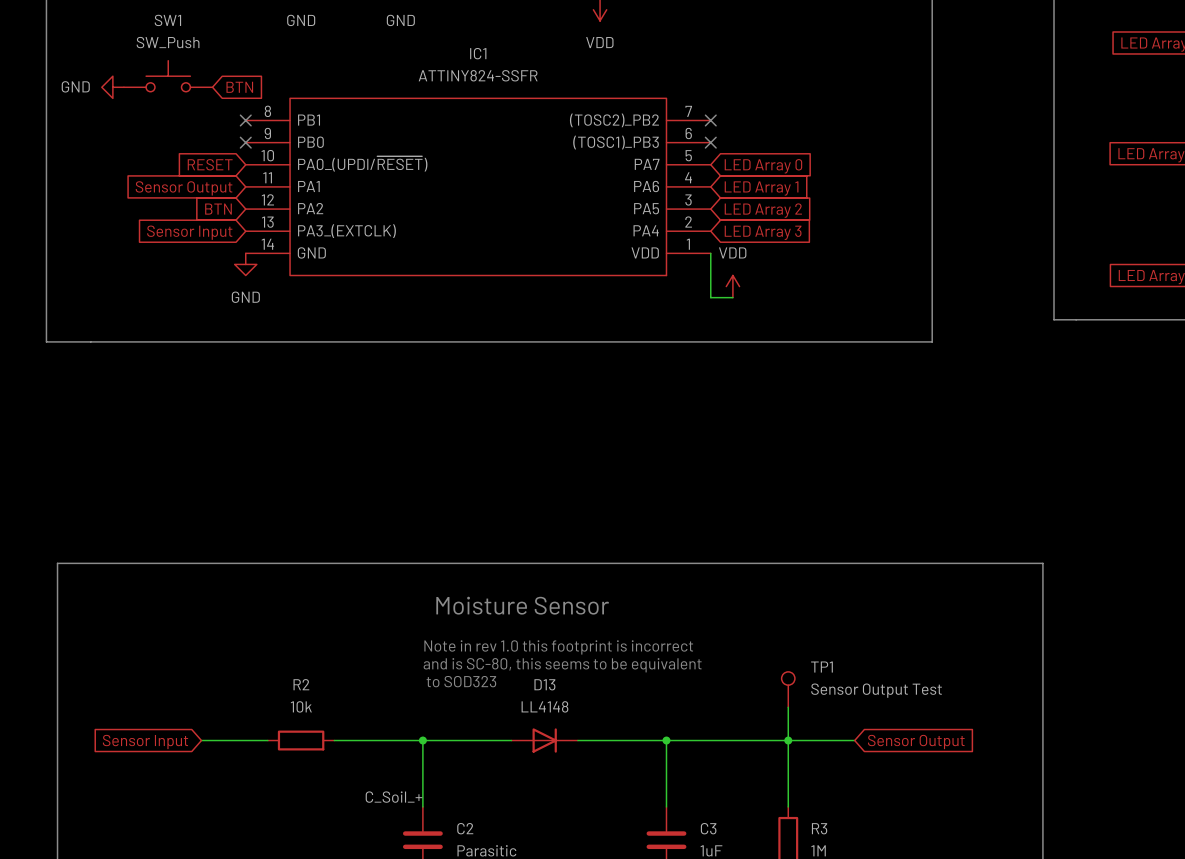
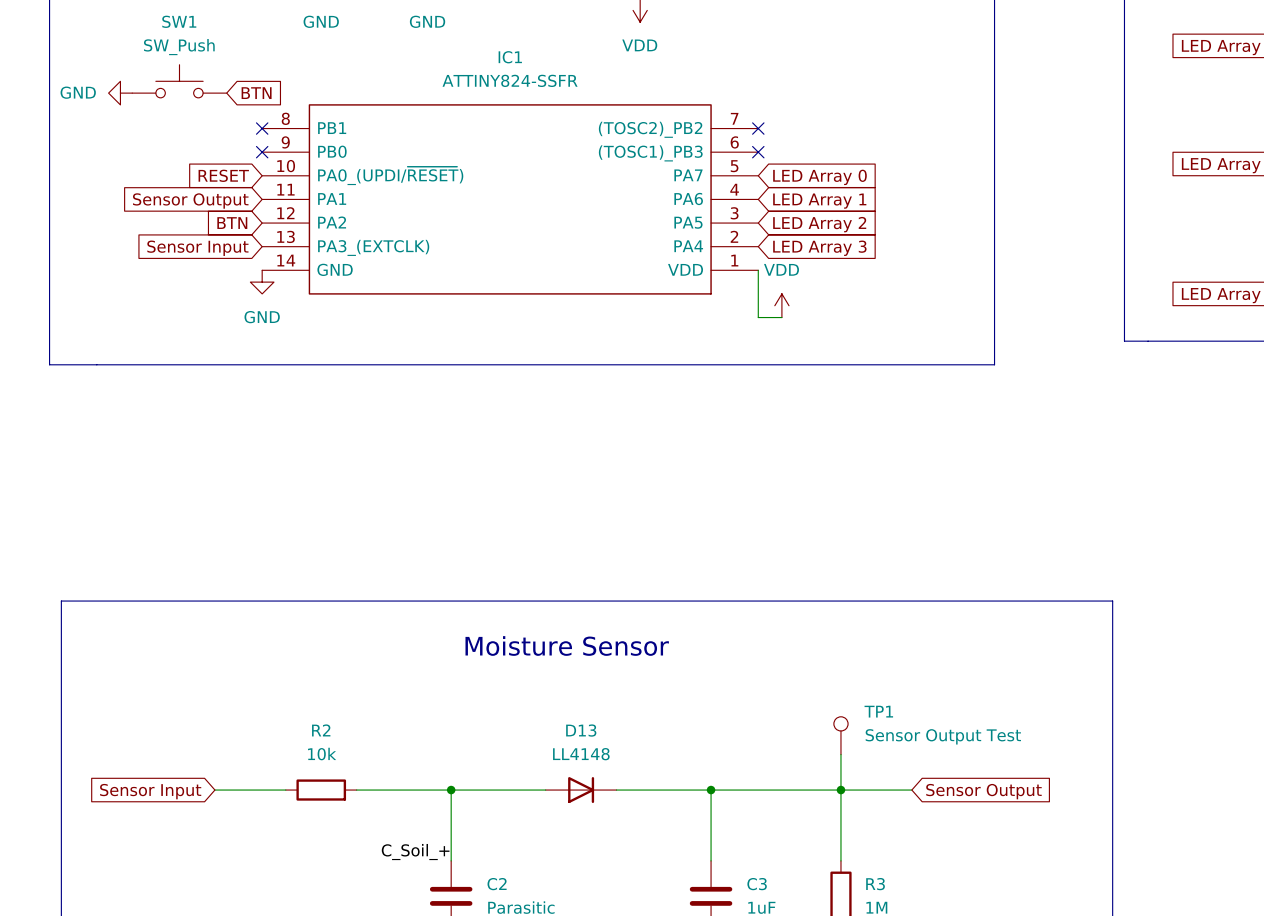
text: Note in rev 1.0 this footprint is incorrect (558, 647) -> none
text: and is SC-80, this seems to be equivalent (562, 665) -> none
text: to SOD323 (461, 681) -> none

